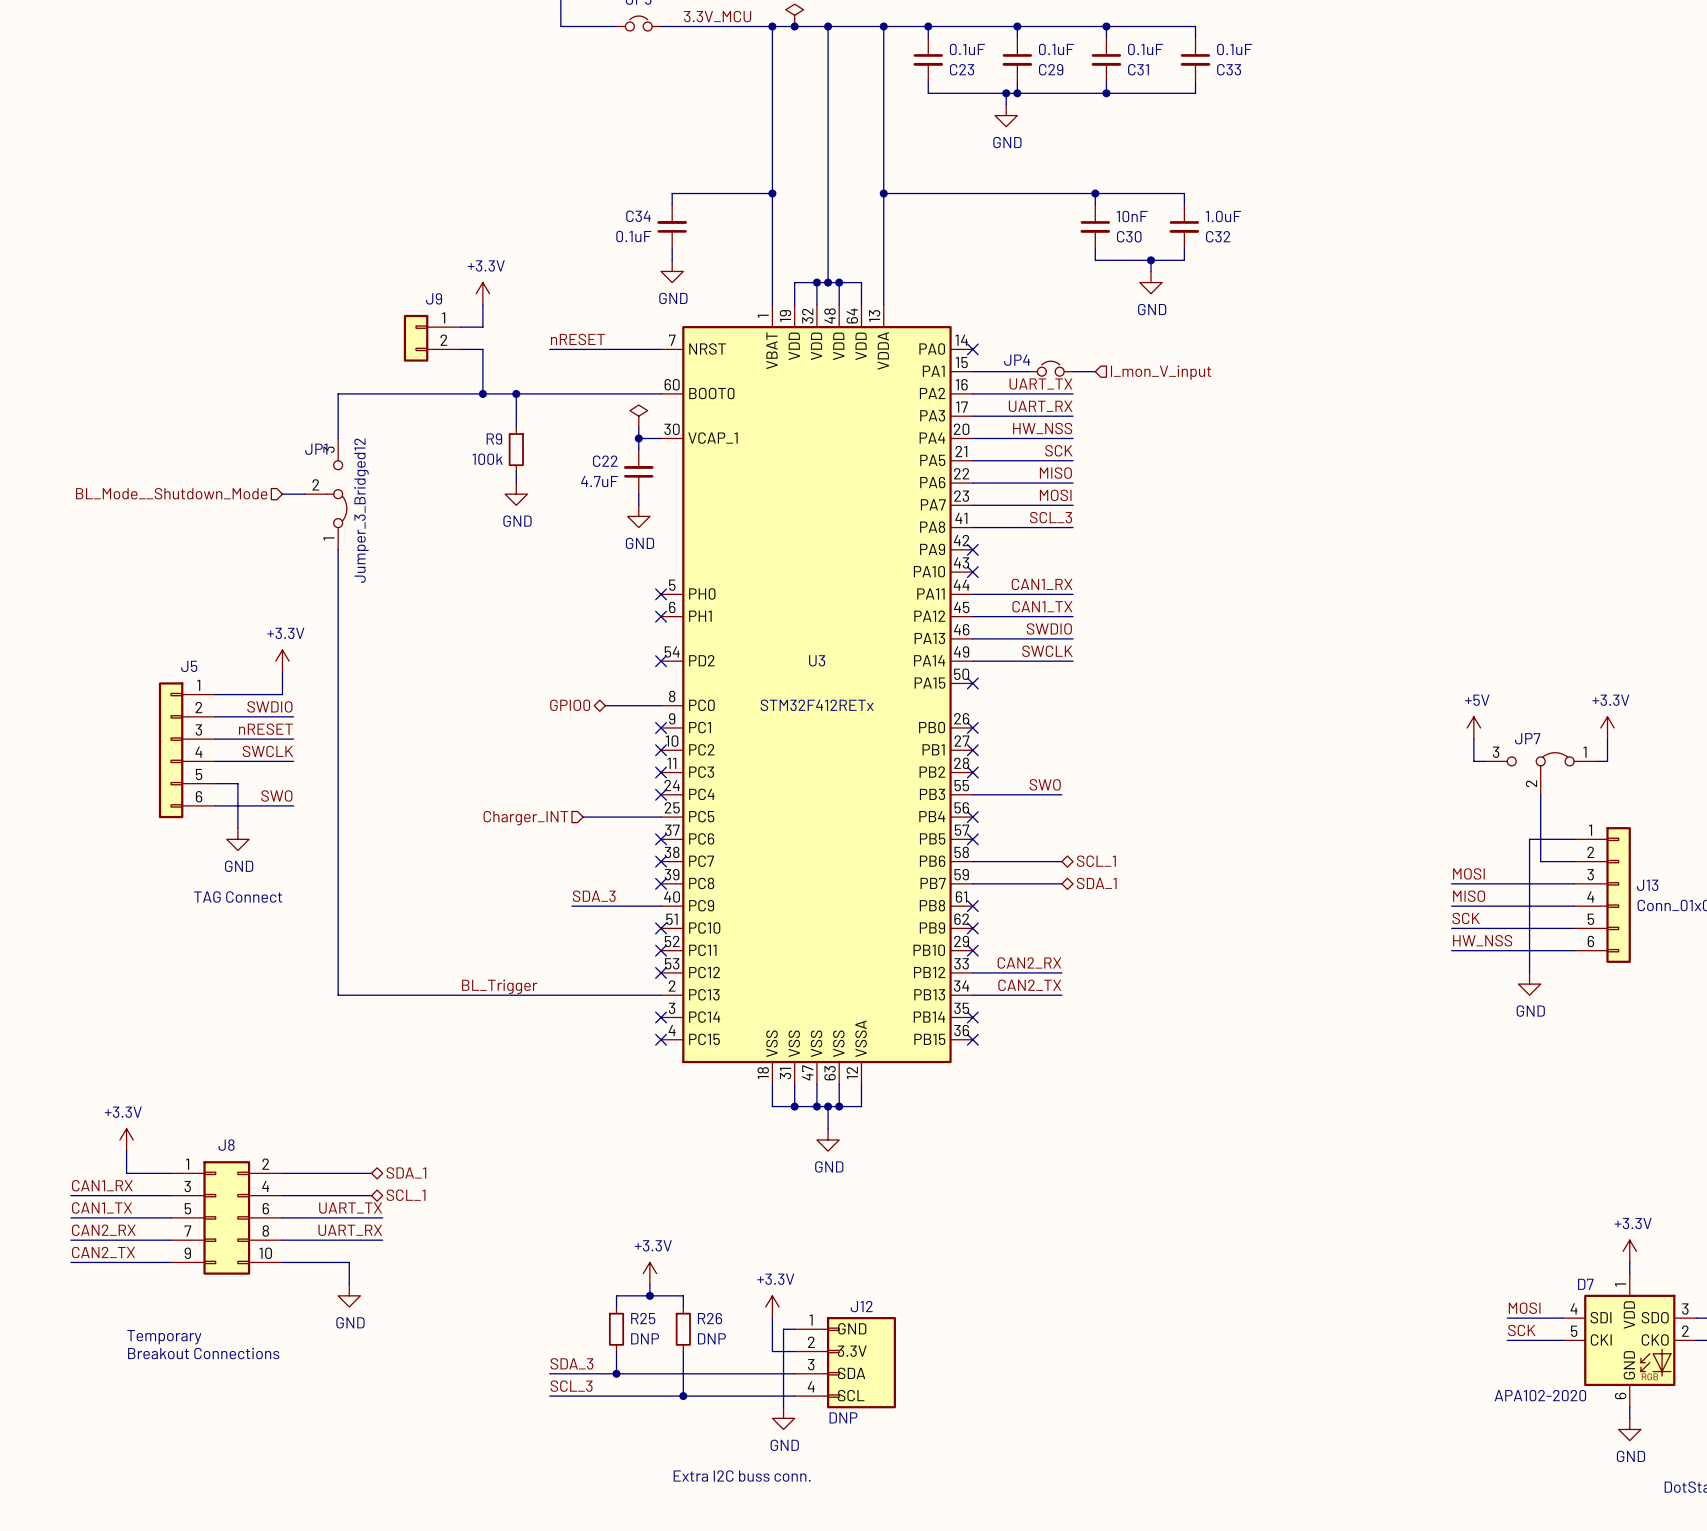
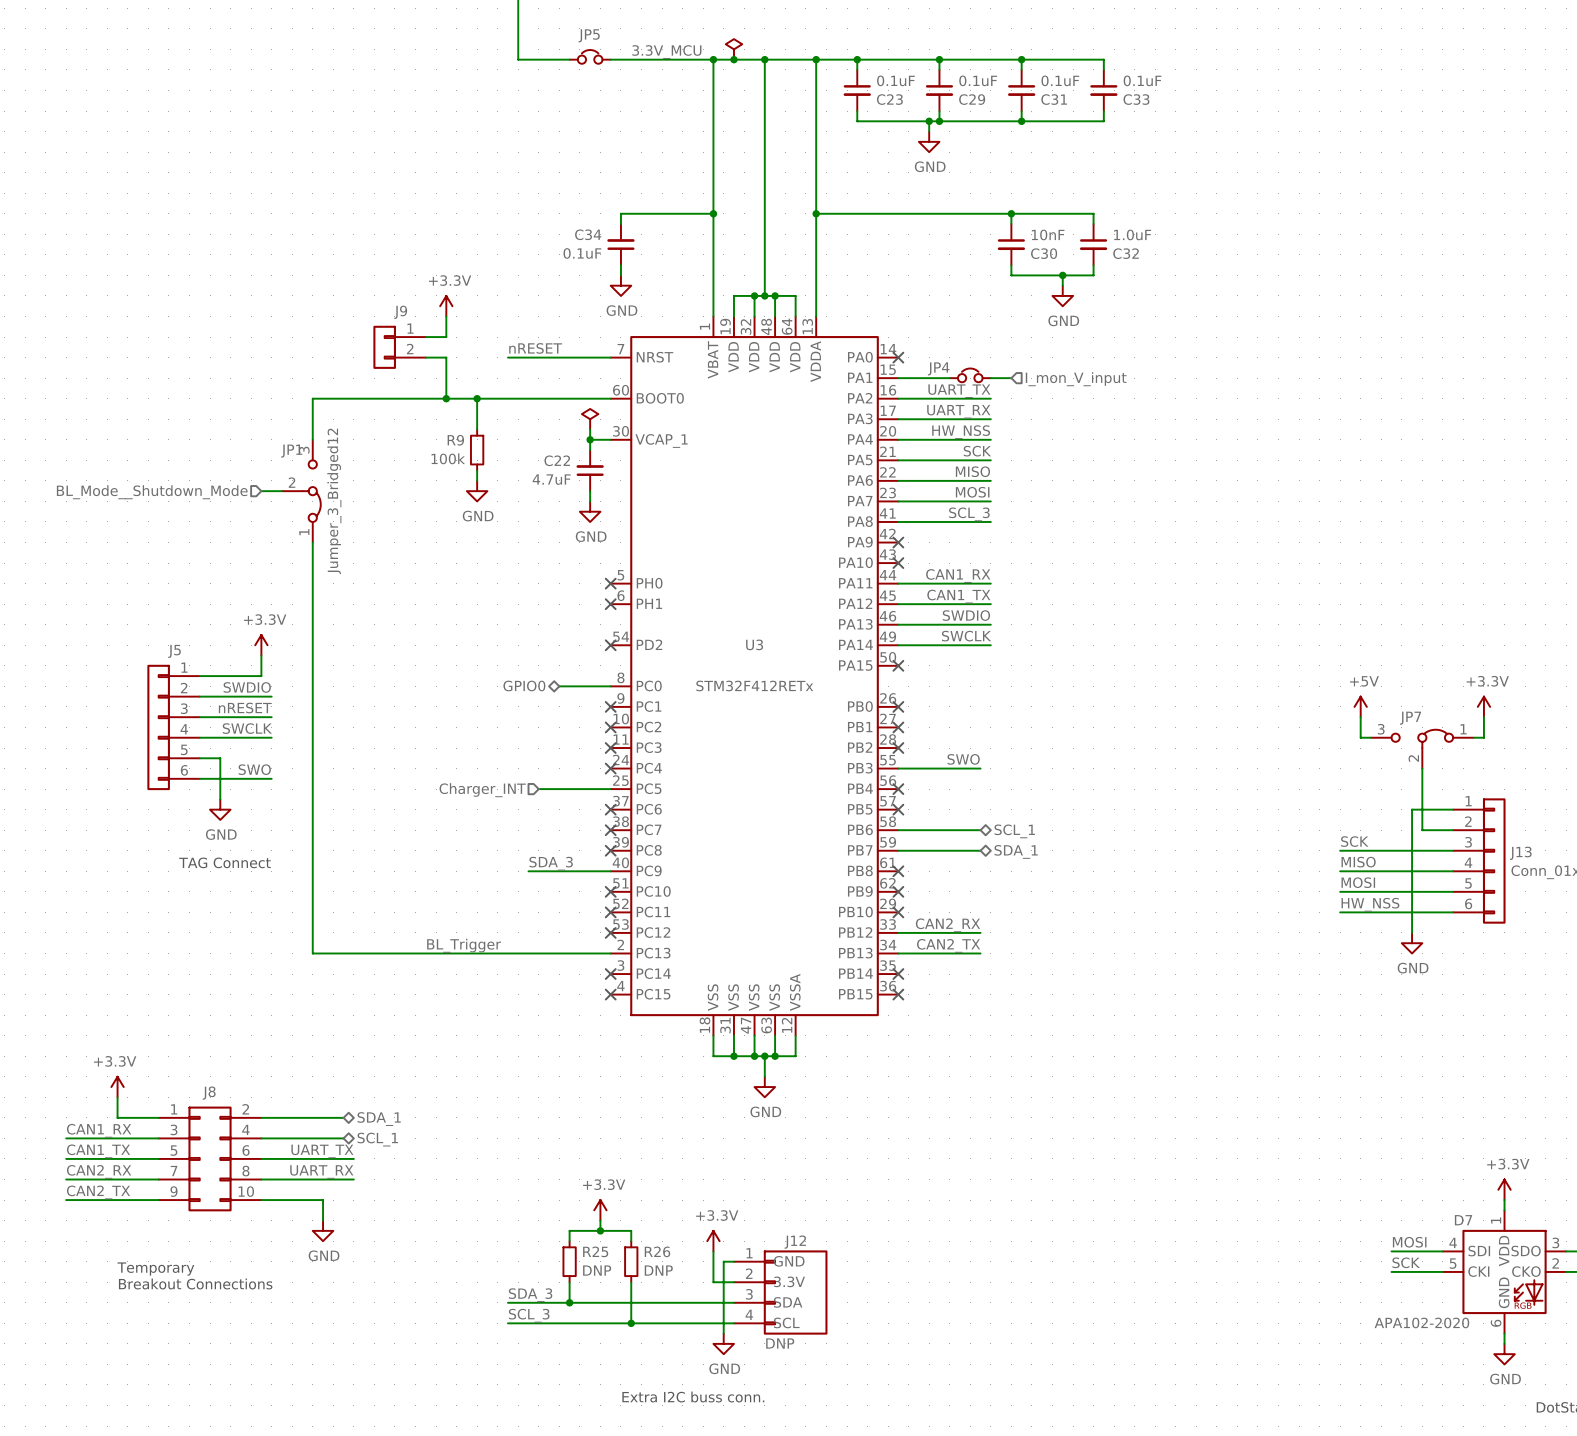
label: MOSI (1468, 873) -> SCK (1354, 841)
label: SCK (1466, 918) -> MOSI (1358, 882)

